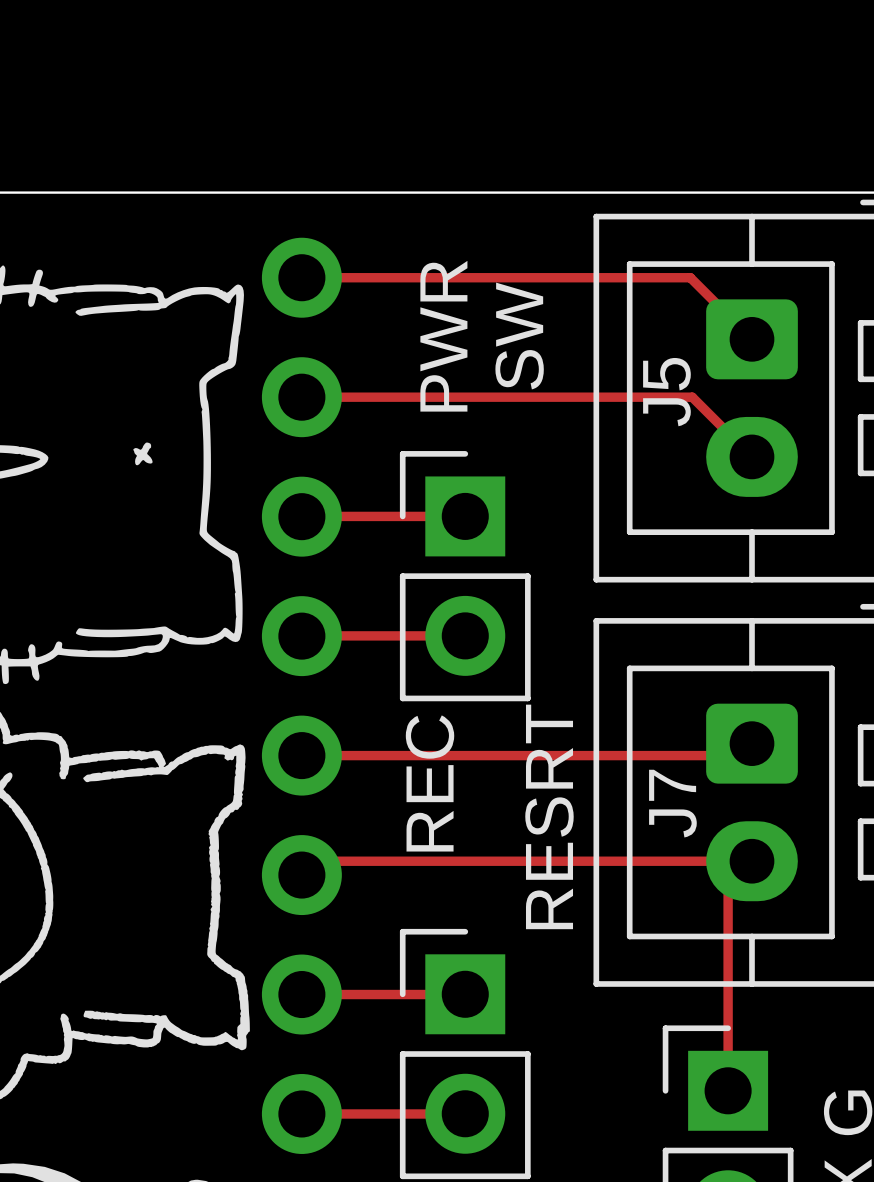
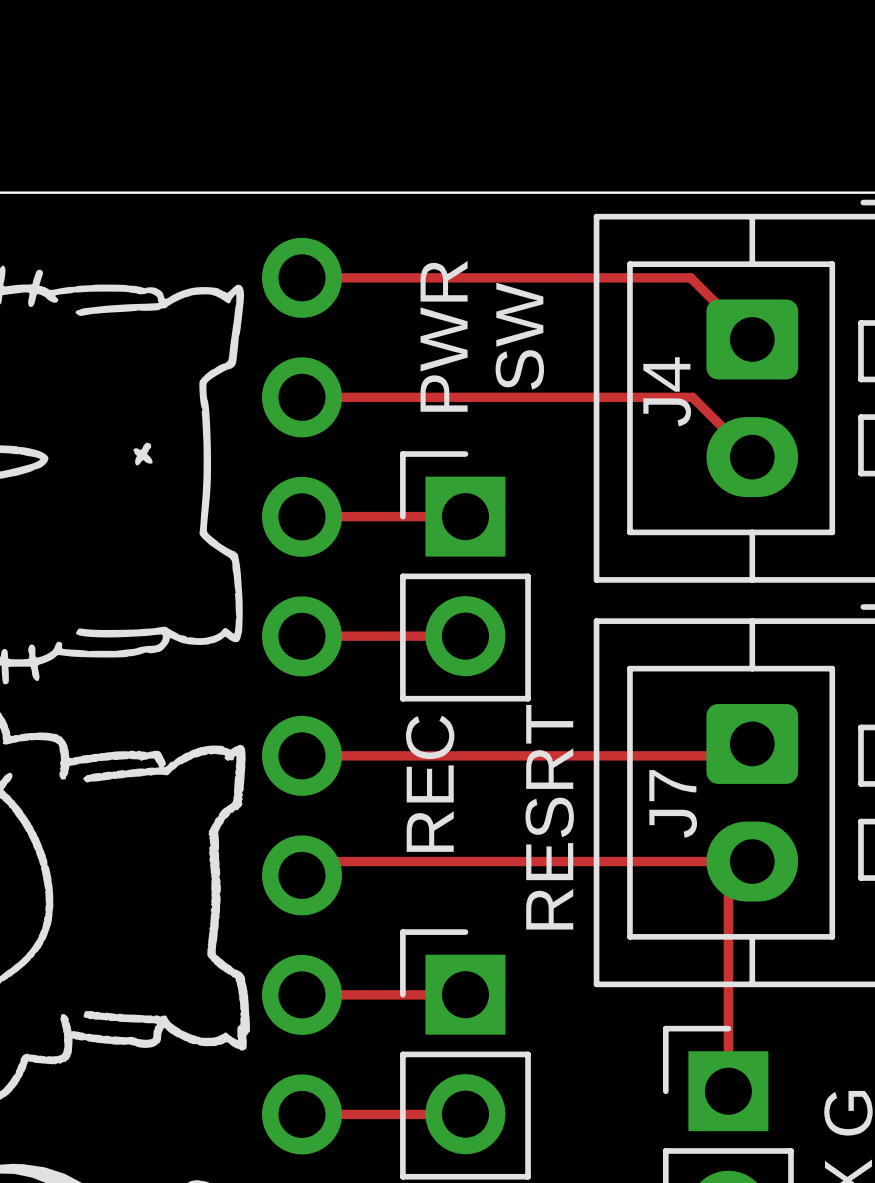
J5 name: J5 (666, 392) -> J4 (667, 391)

